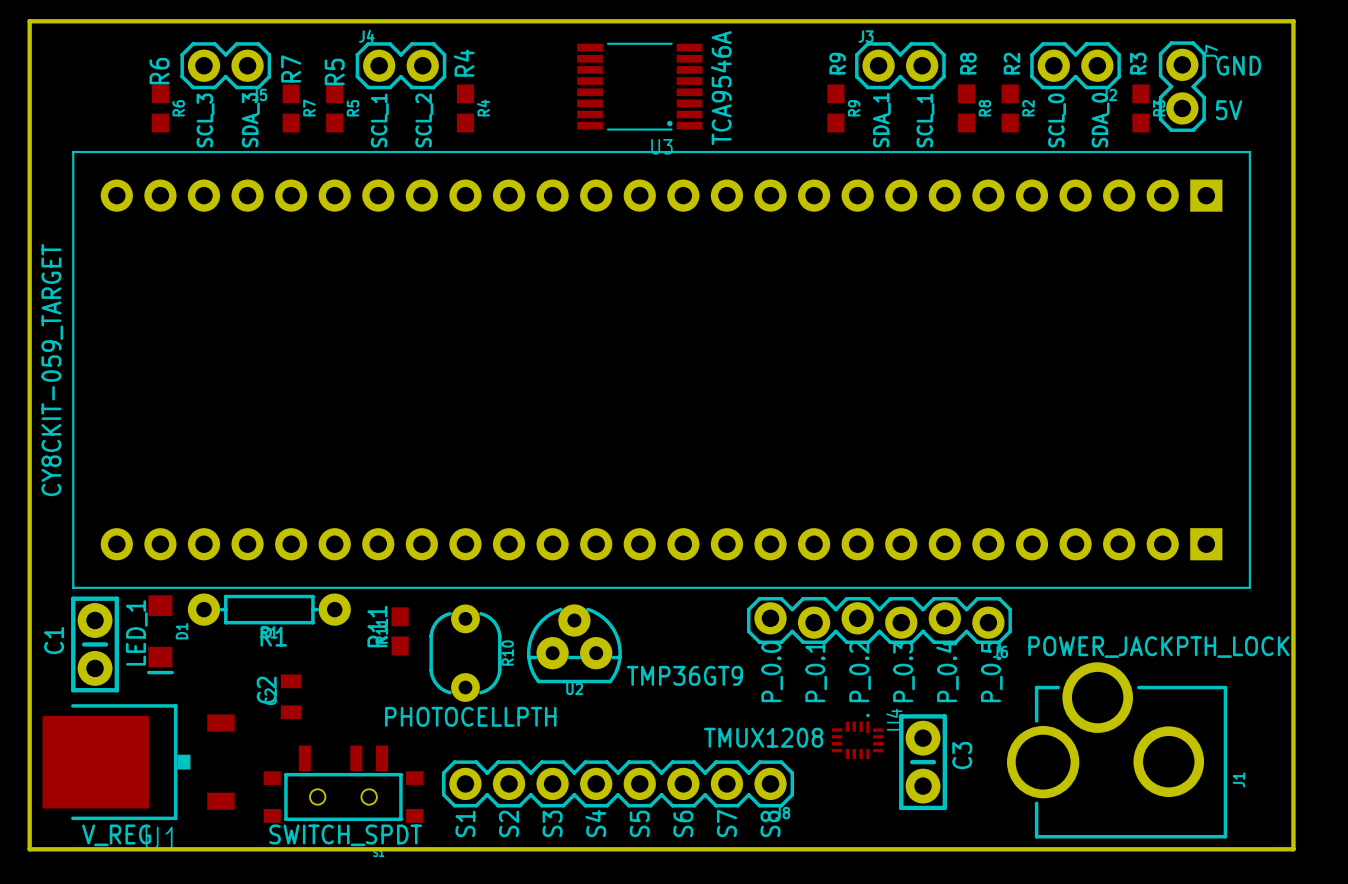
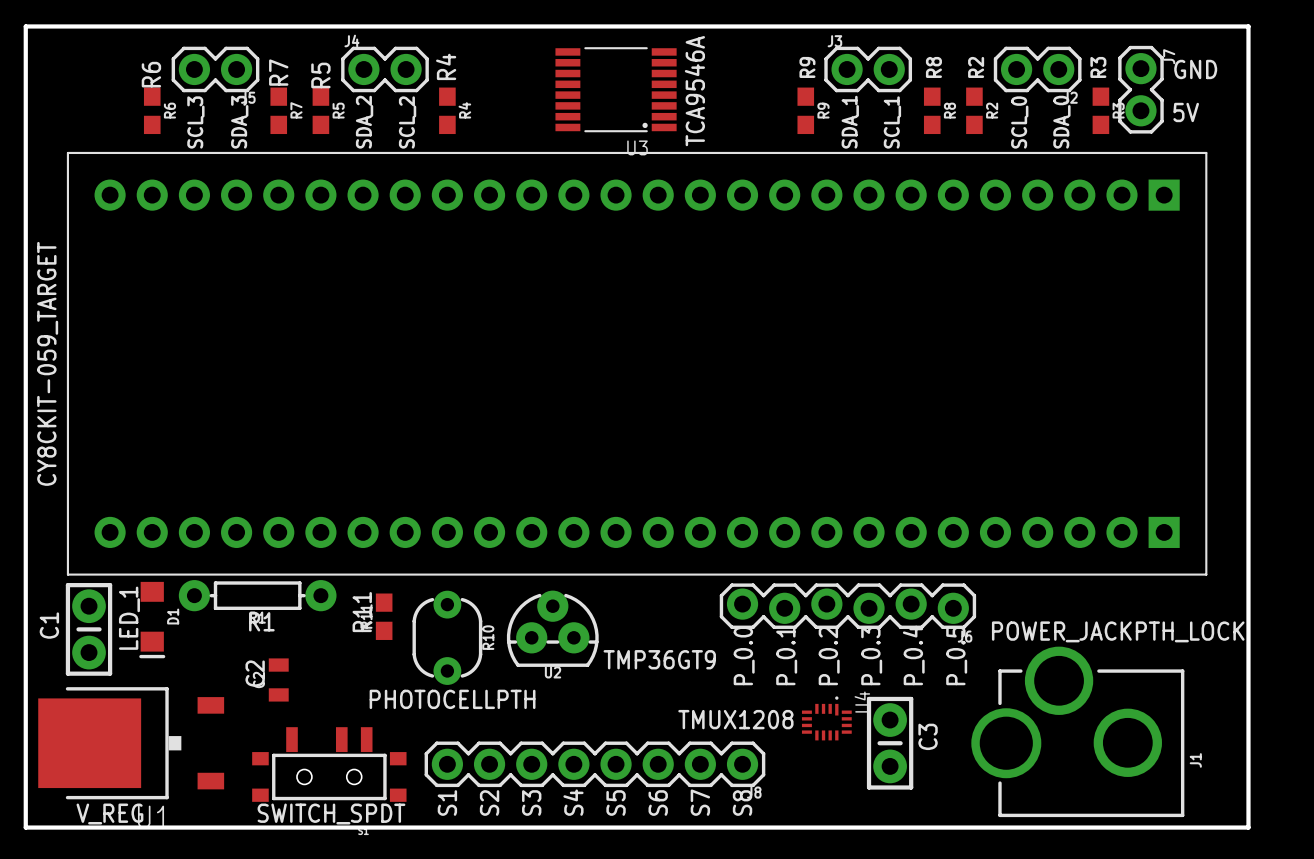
text: SCL_1 (379, 120) -> SDA_2 (364, 122)

